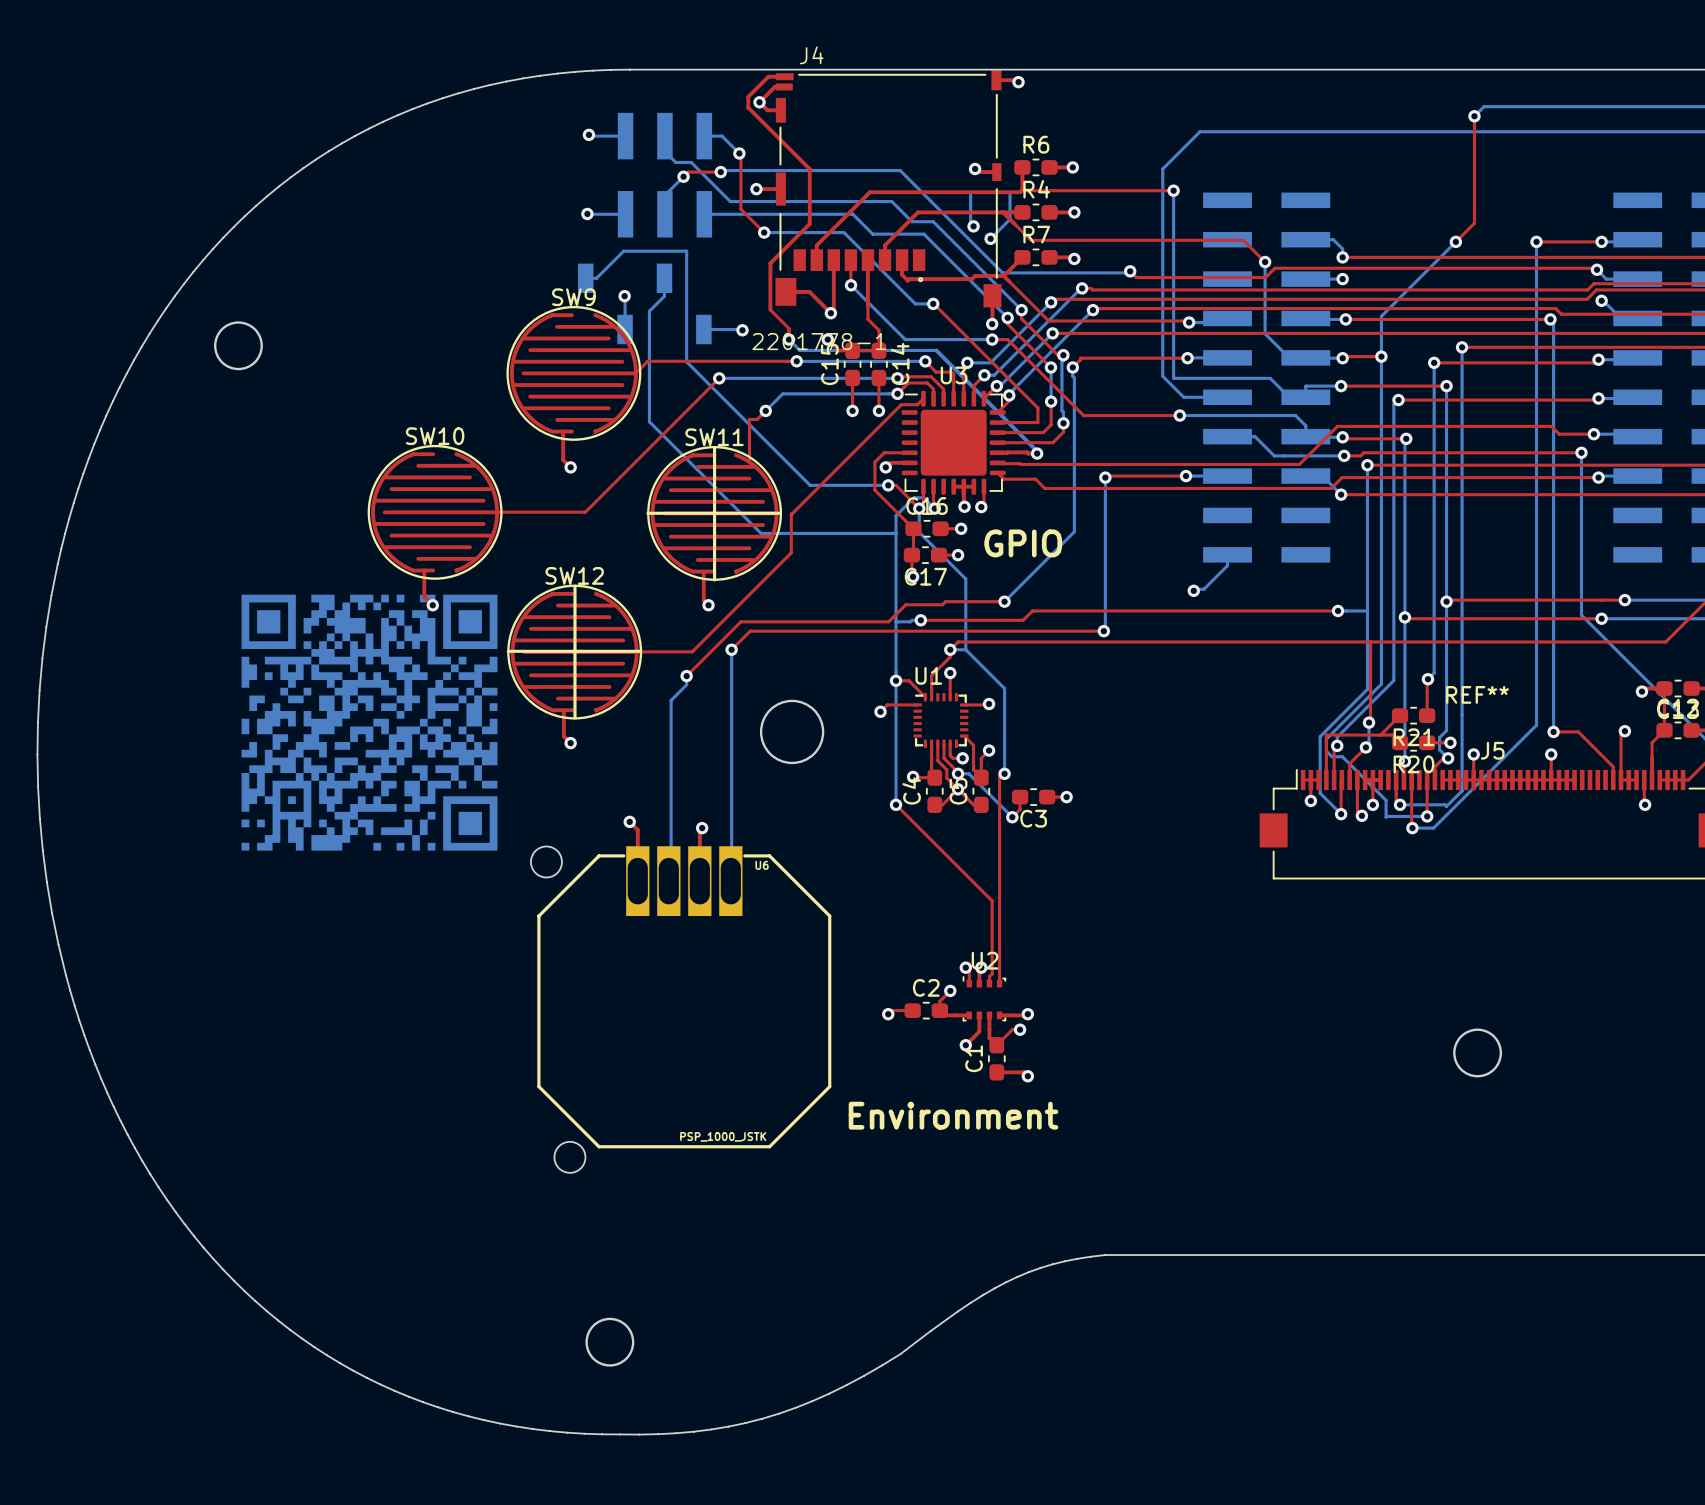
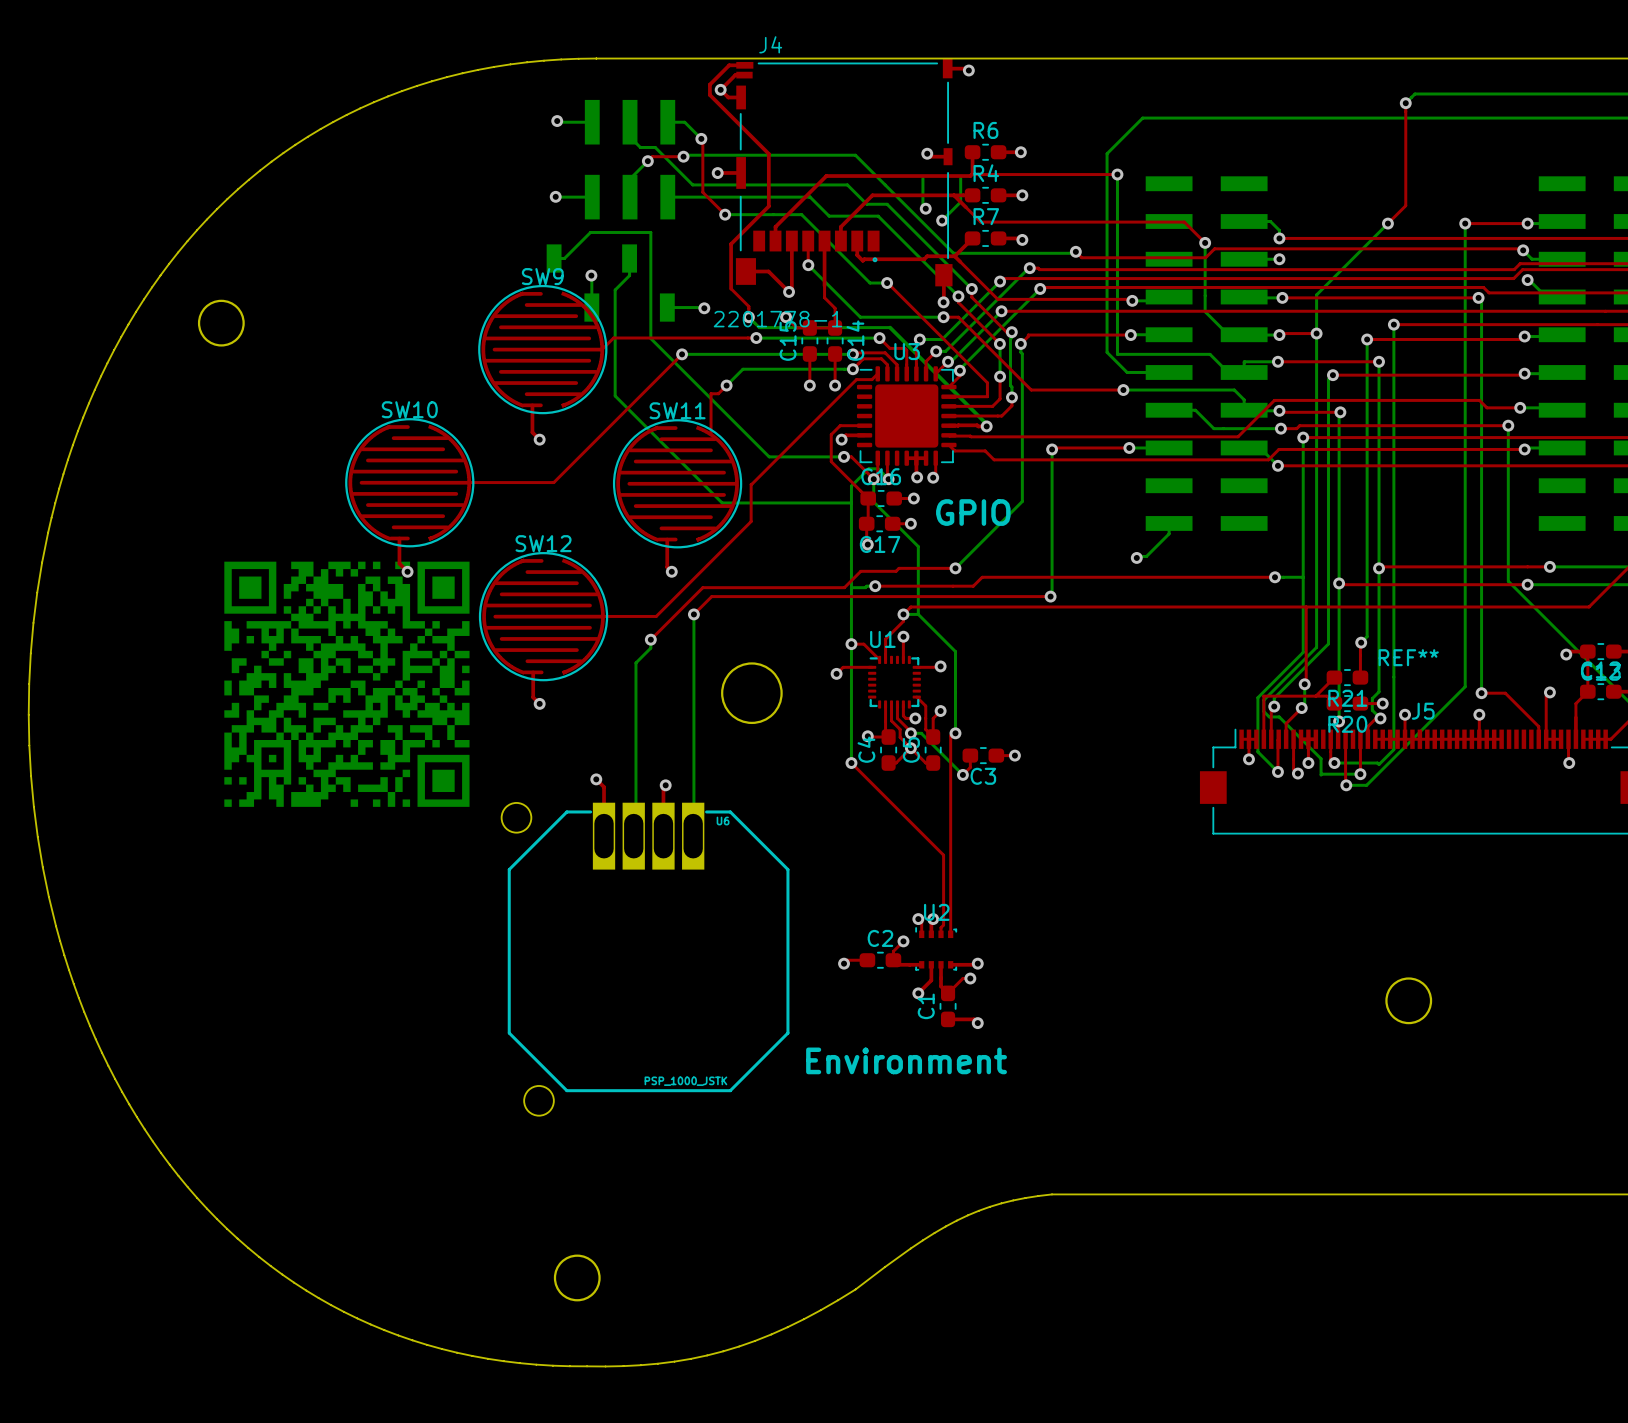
line: (714, 448) (714, 579) -> none
line: (647, 513) (779, 513) -> none
line: (574, 586) (574, 717) -> none
line: (508, 651) (640, 651) -> none

